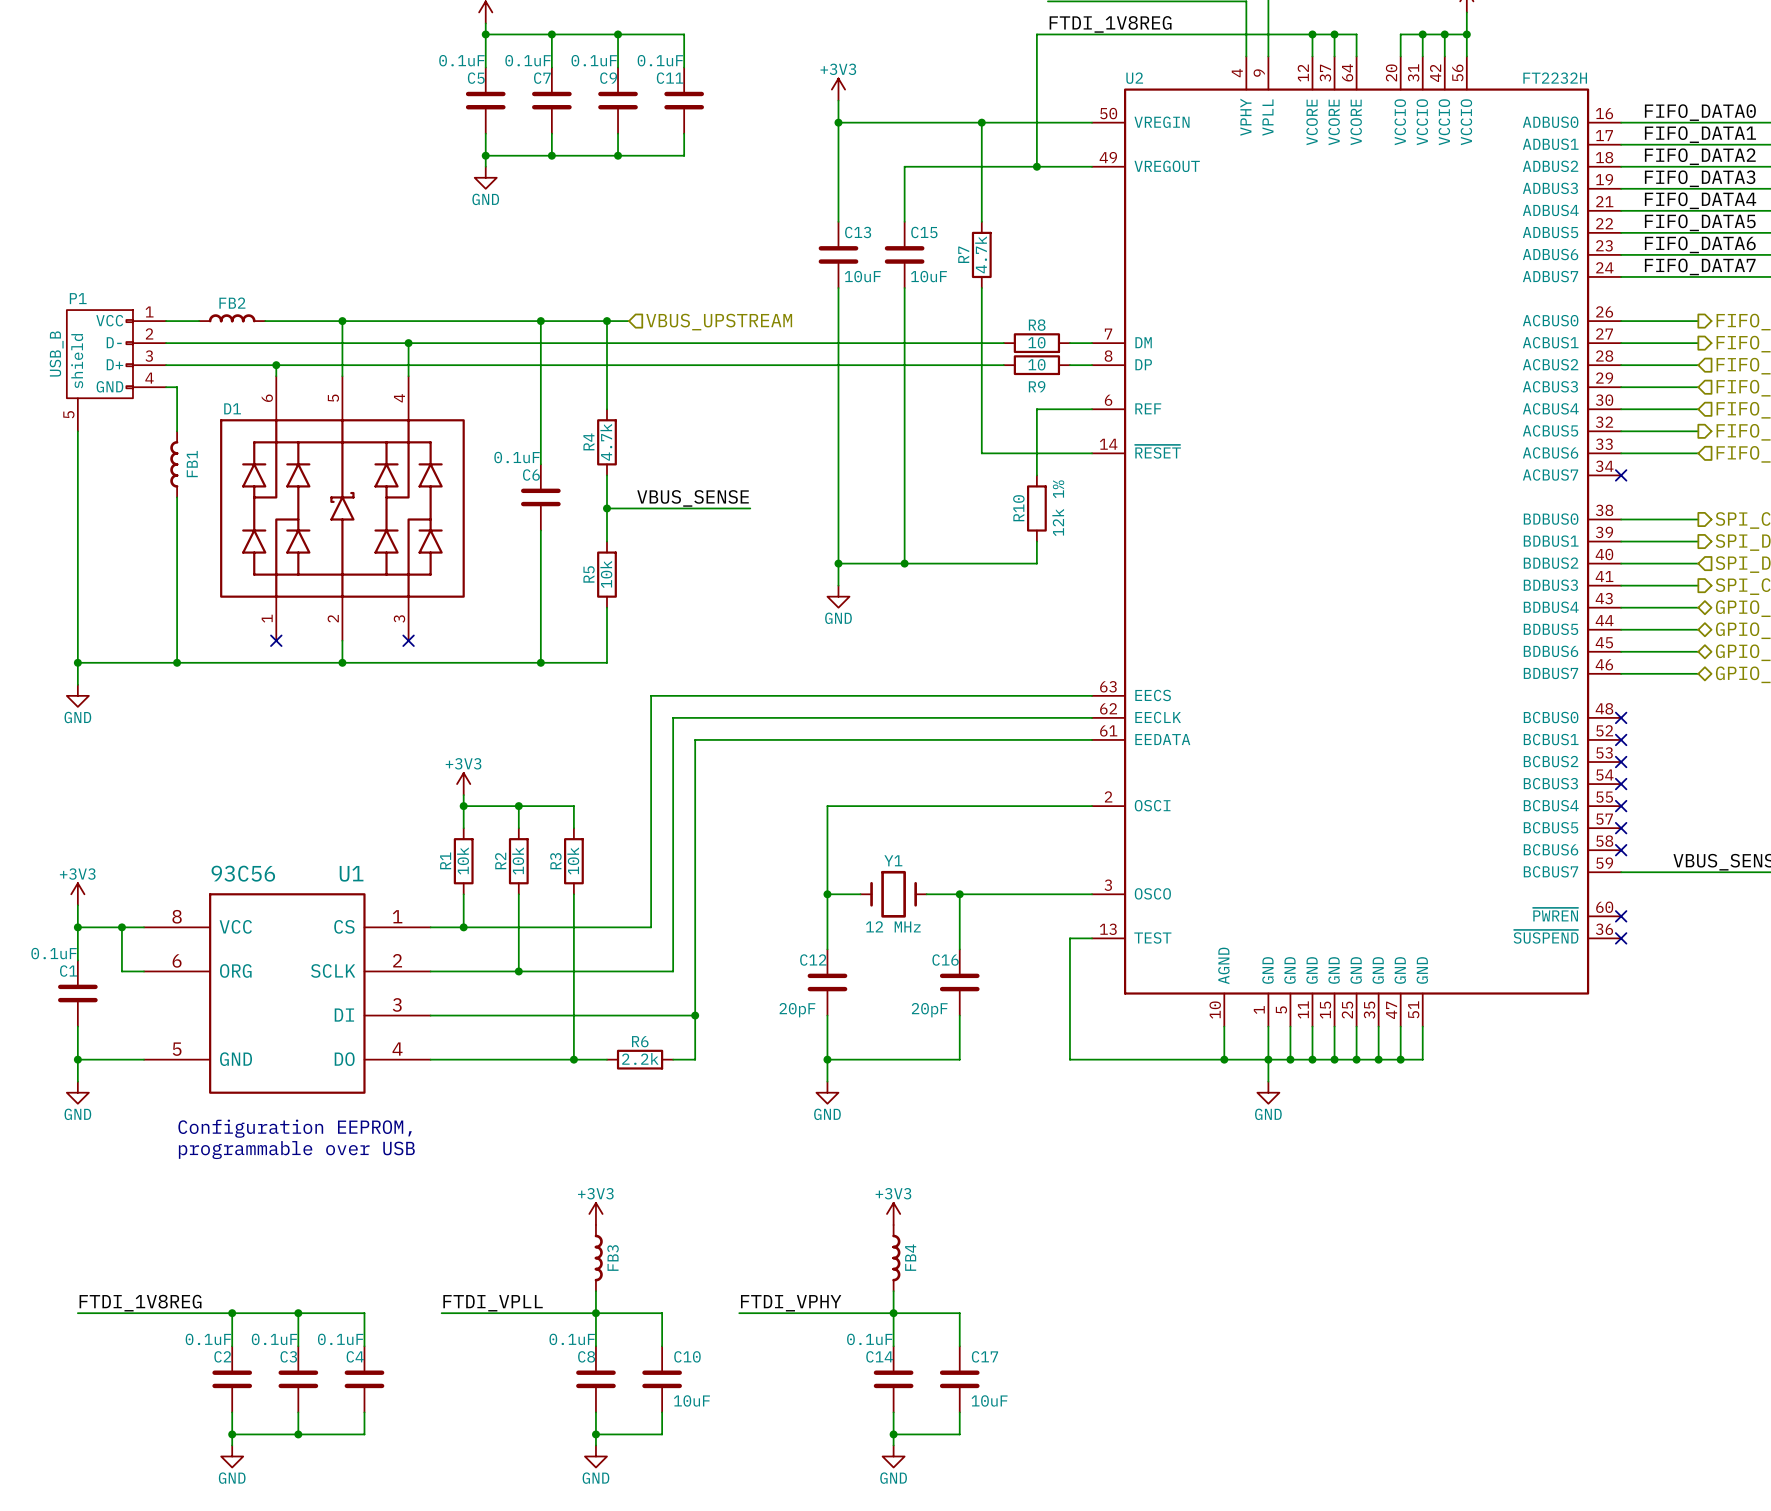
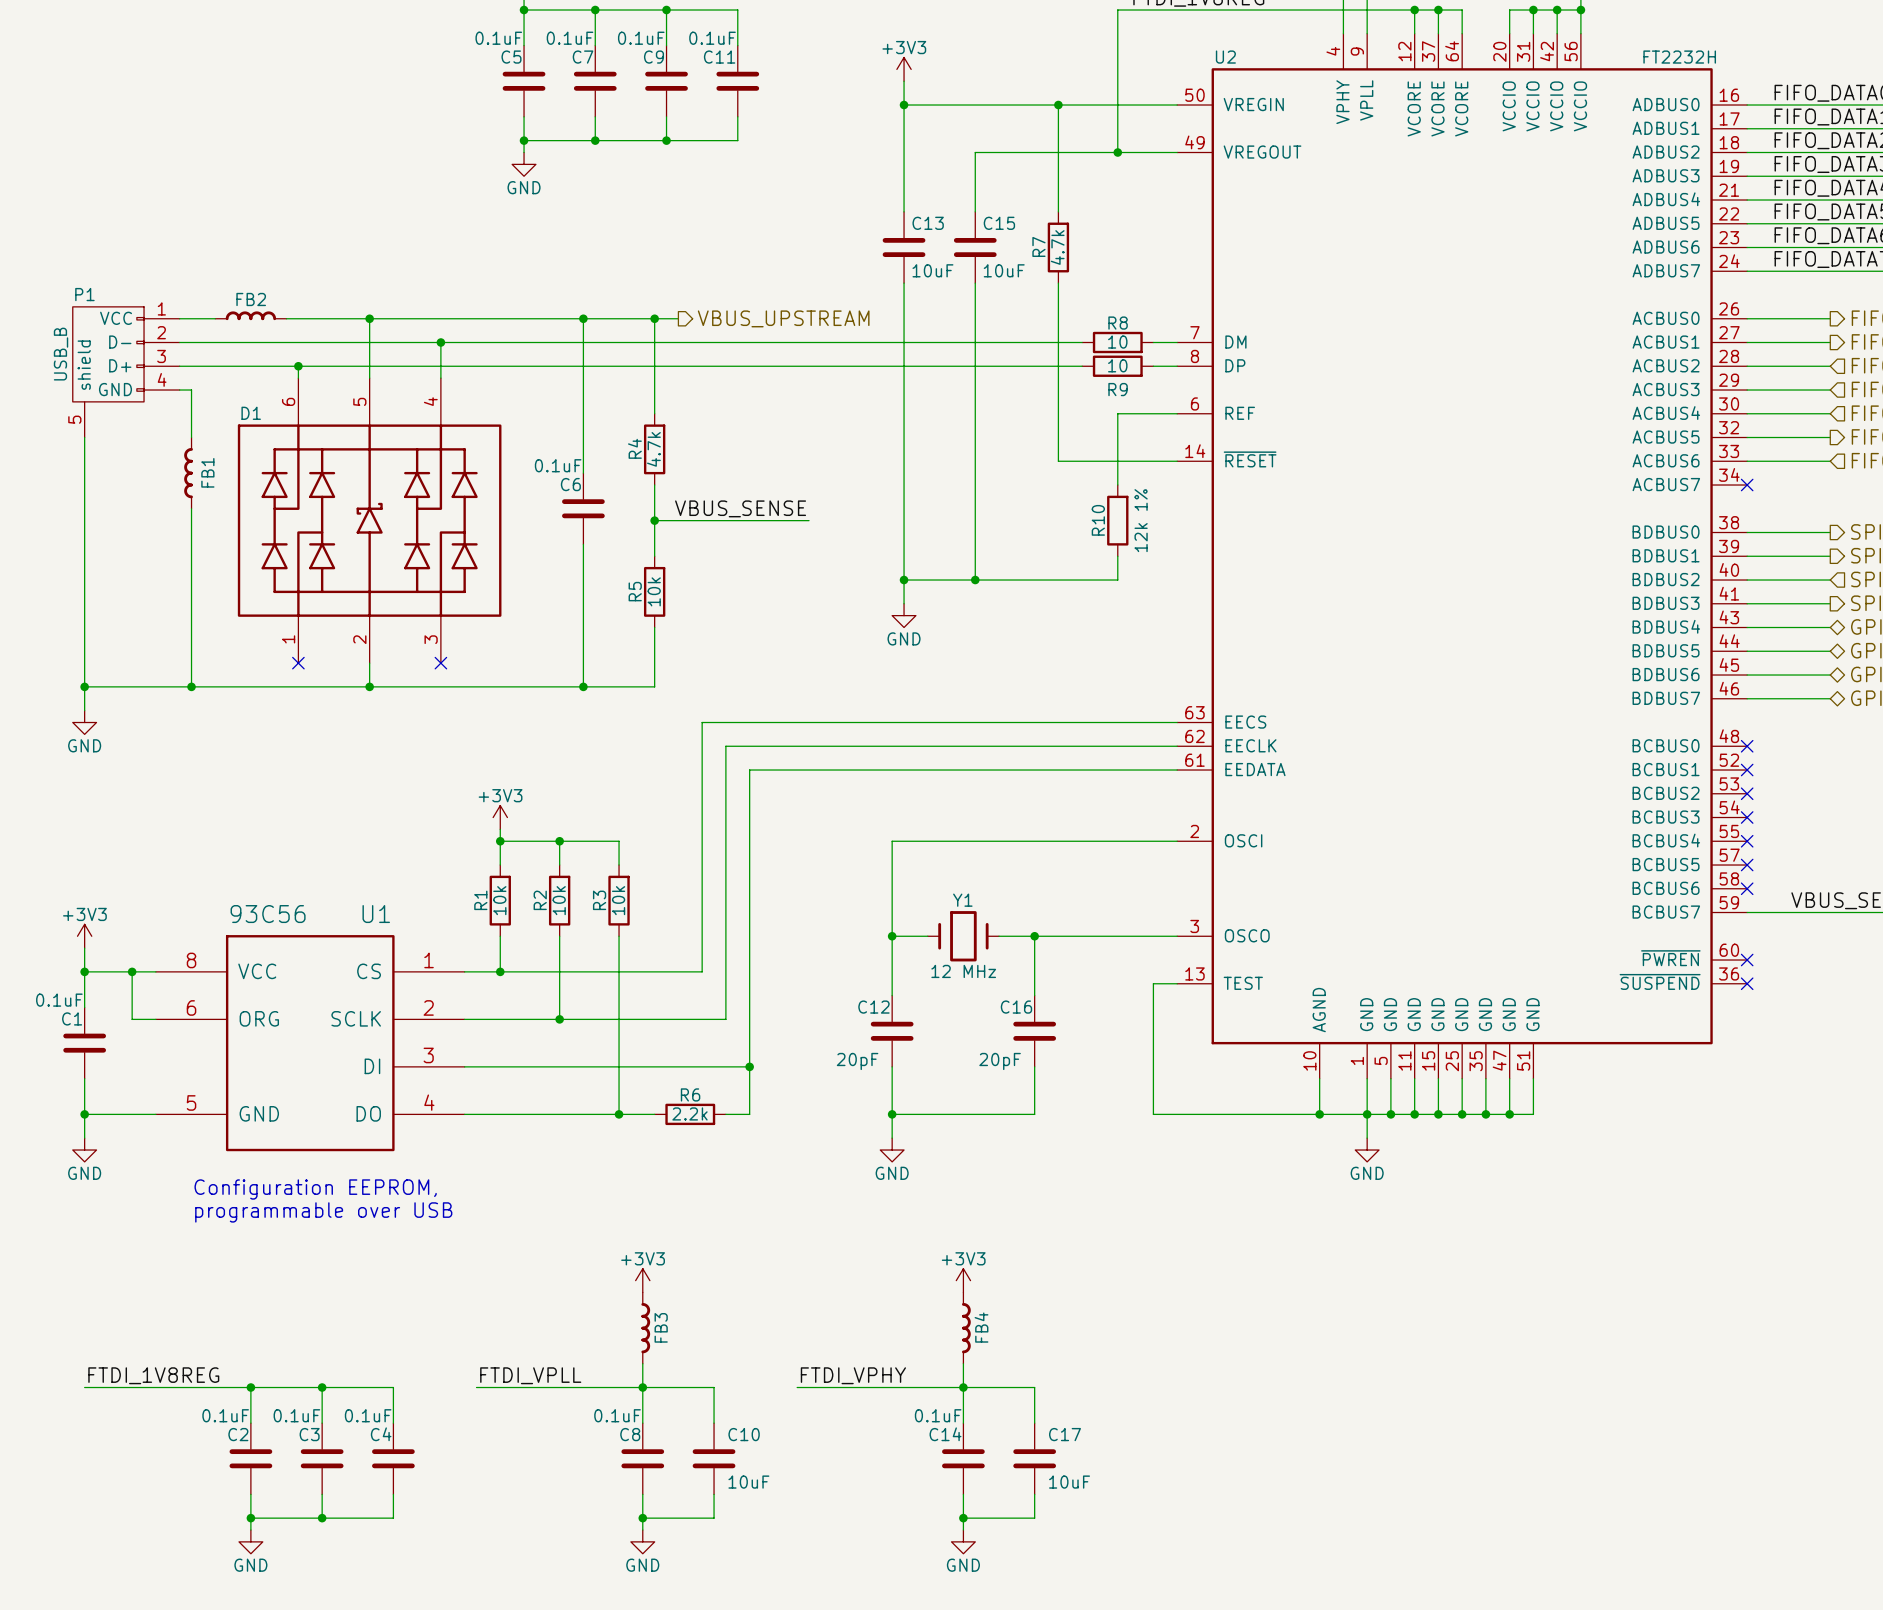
hierarchical label shape: input (719, 322) -> output (783, 318)

